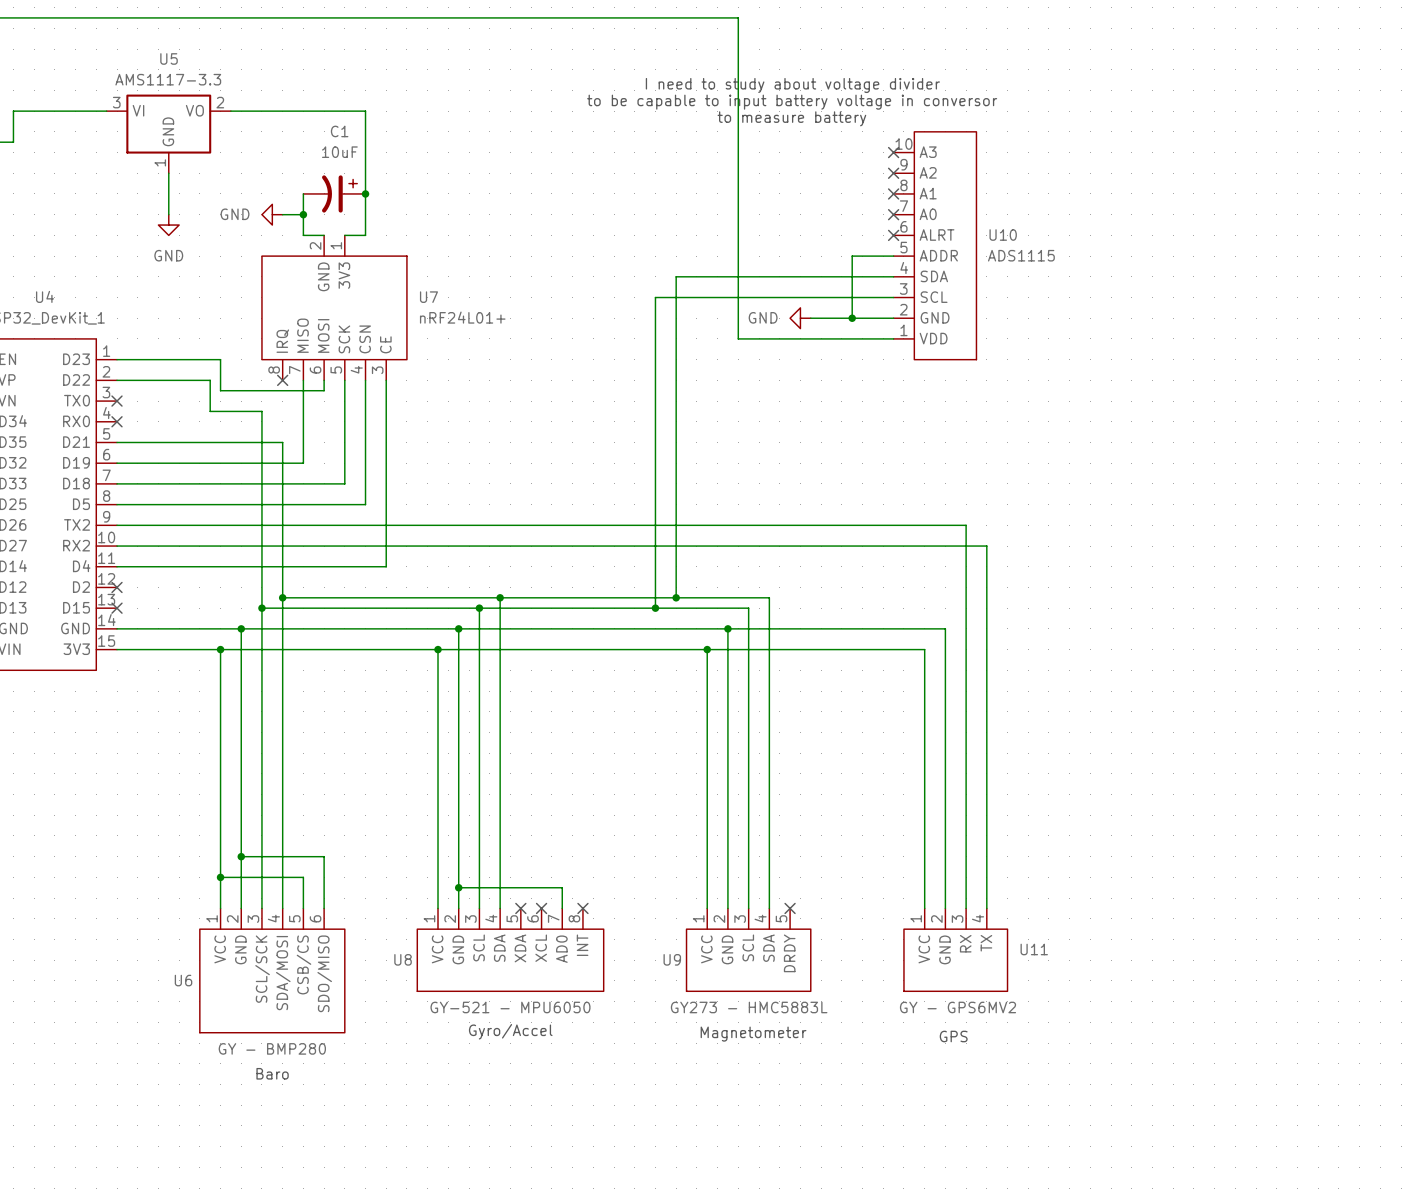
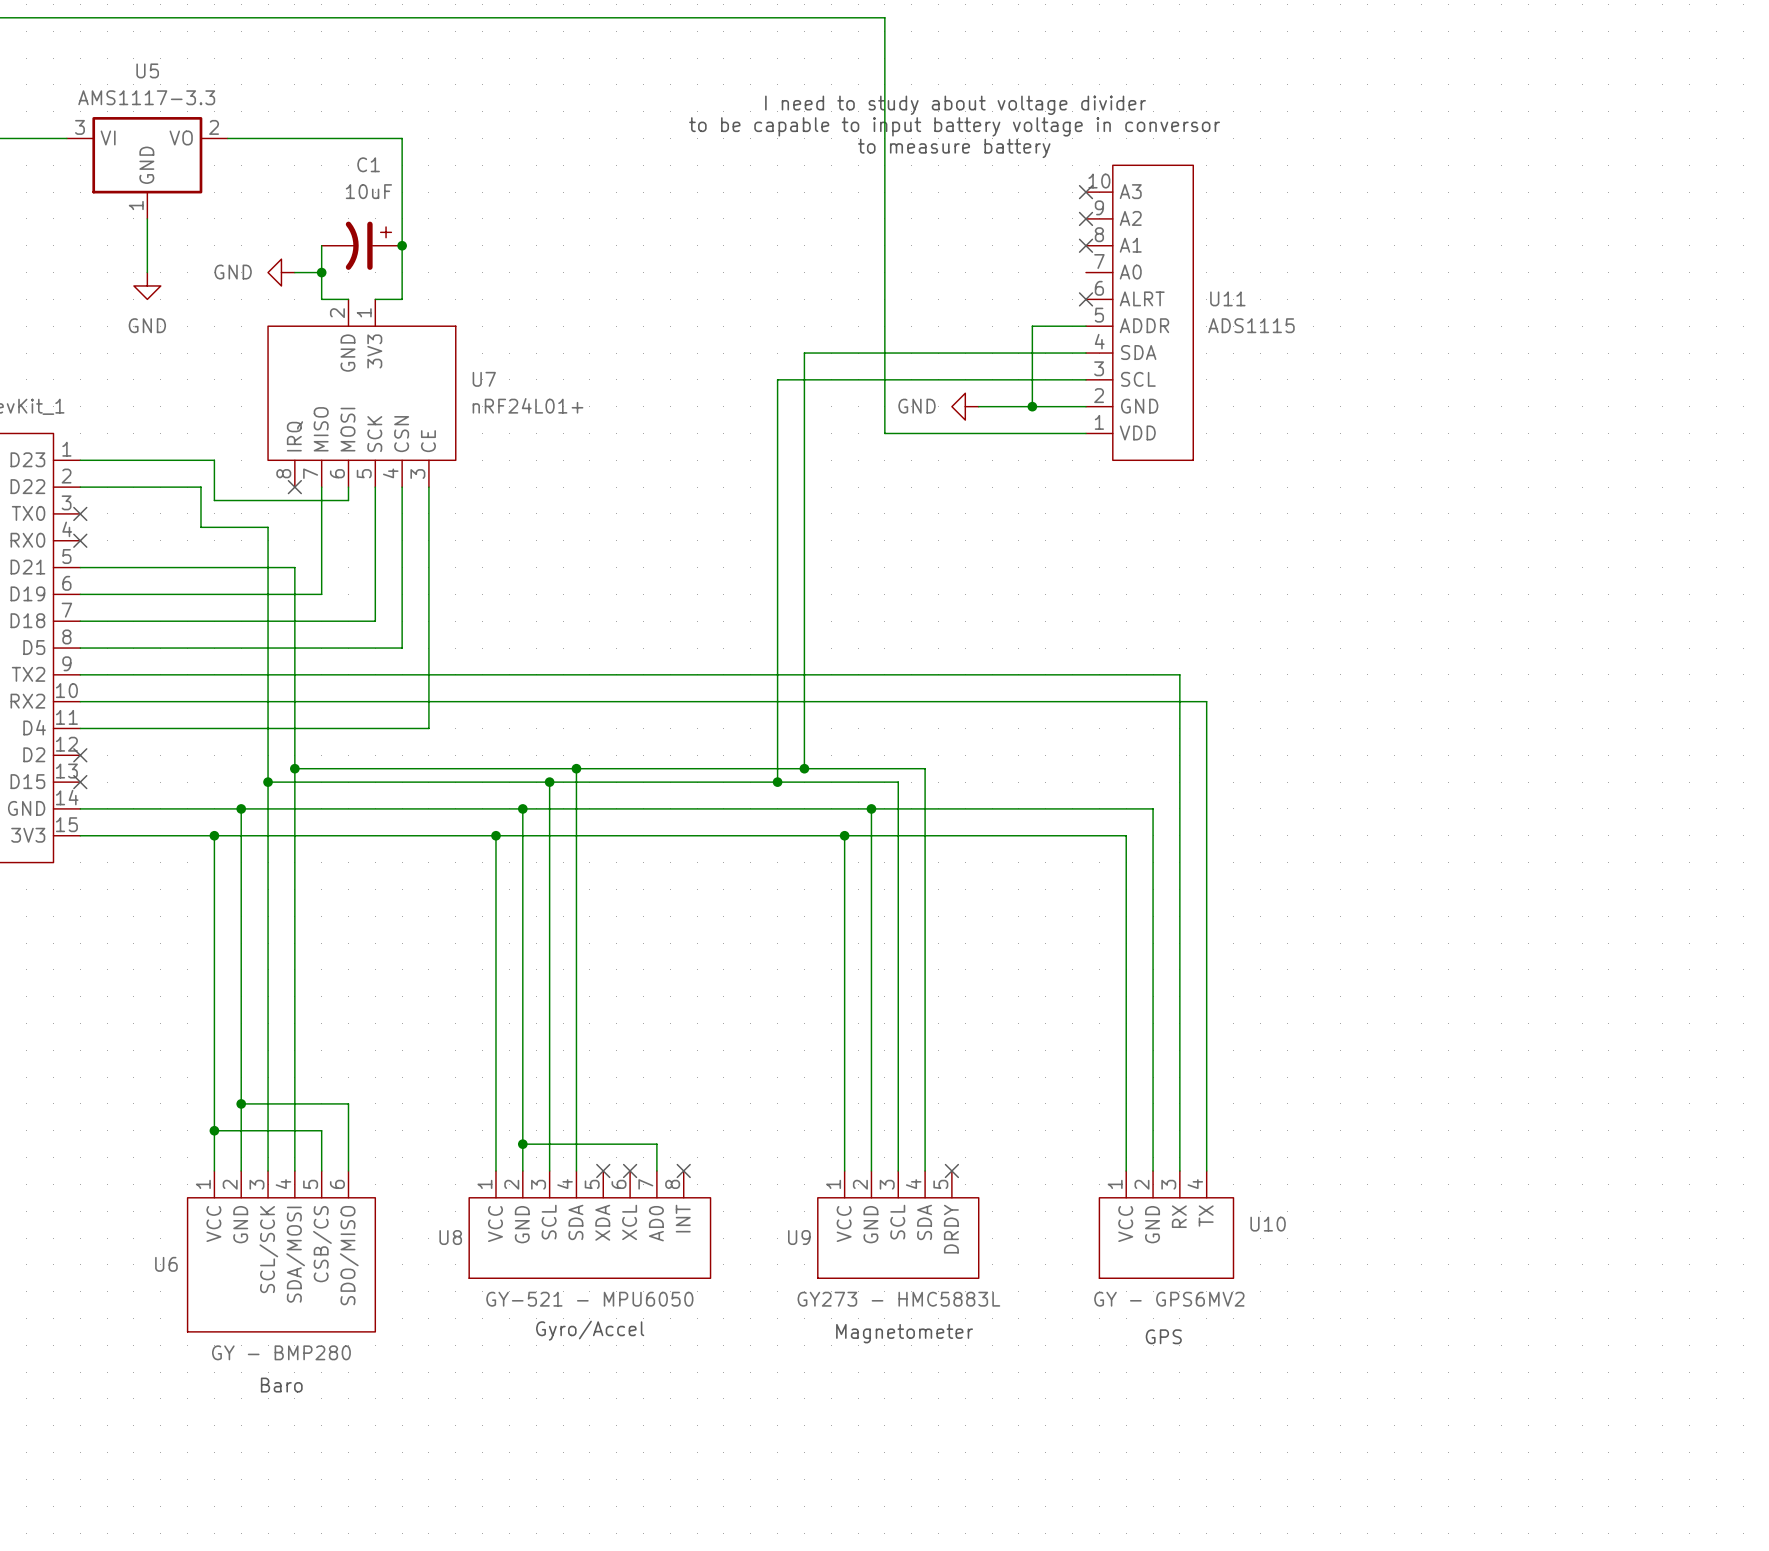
no-connect mark: (893, 214) -> none
U10 name: U10 (1003, 235) -> U11 (1227, 298)
U11 name: U11 (1034, 949) -> U10 (1268, 1224)

